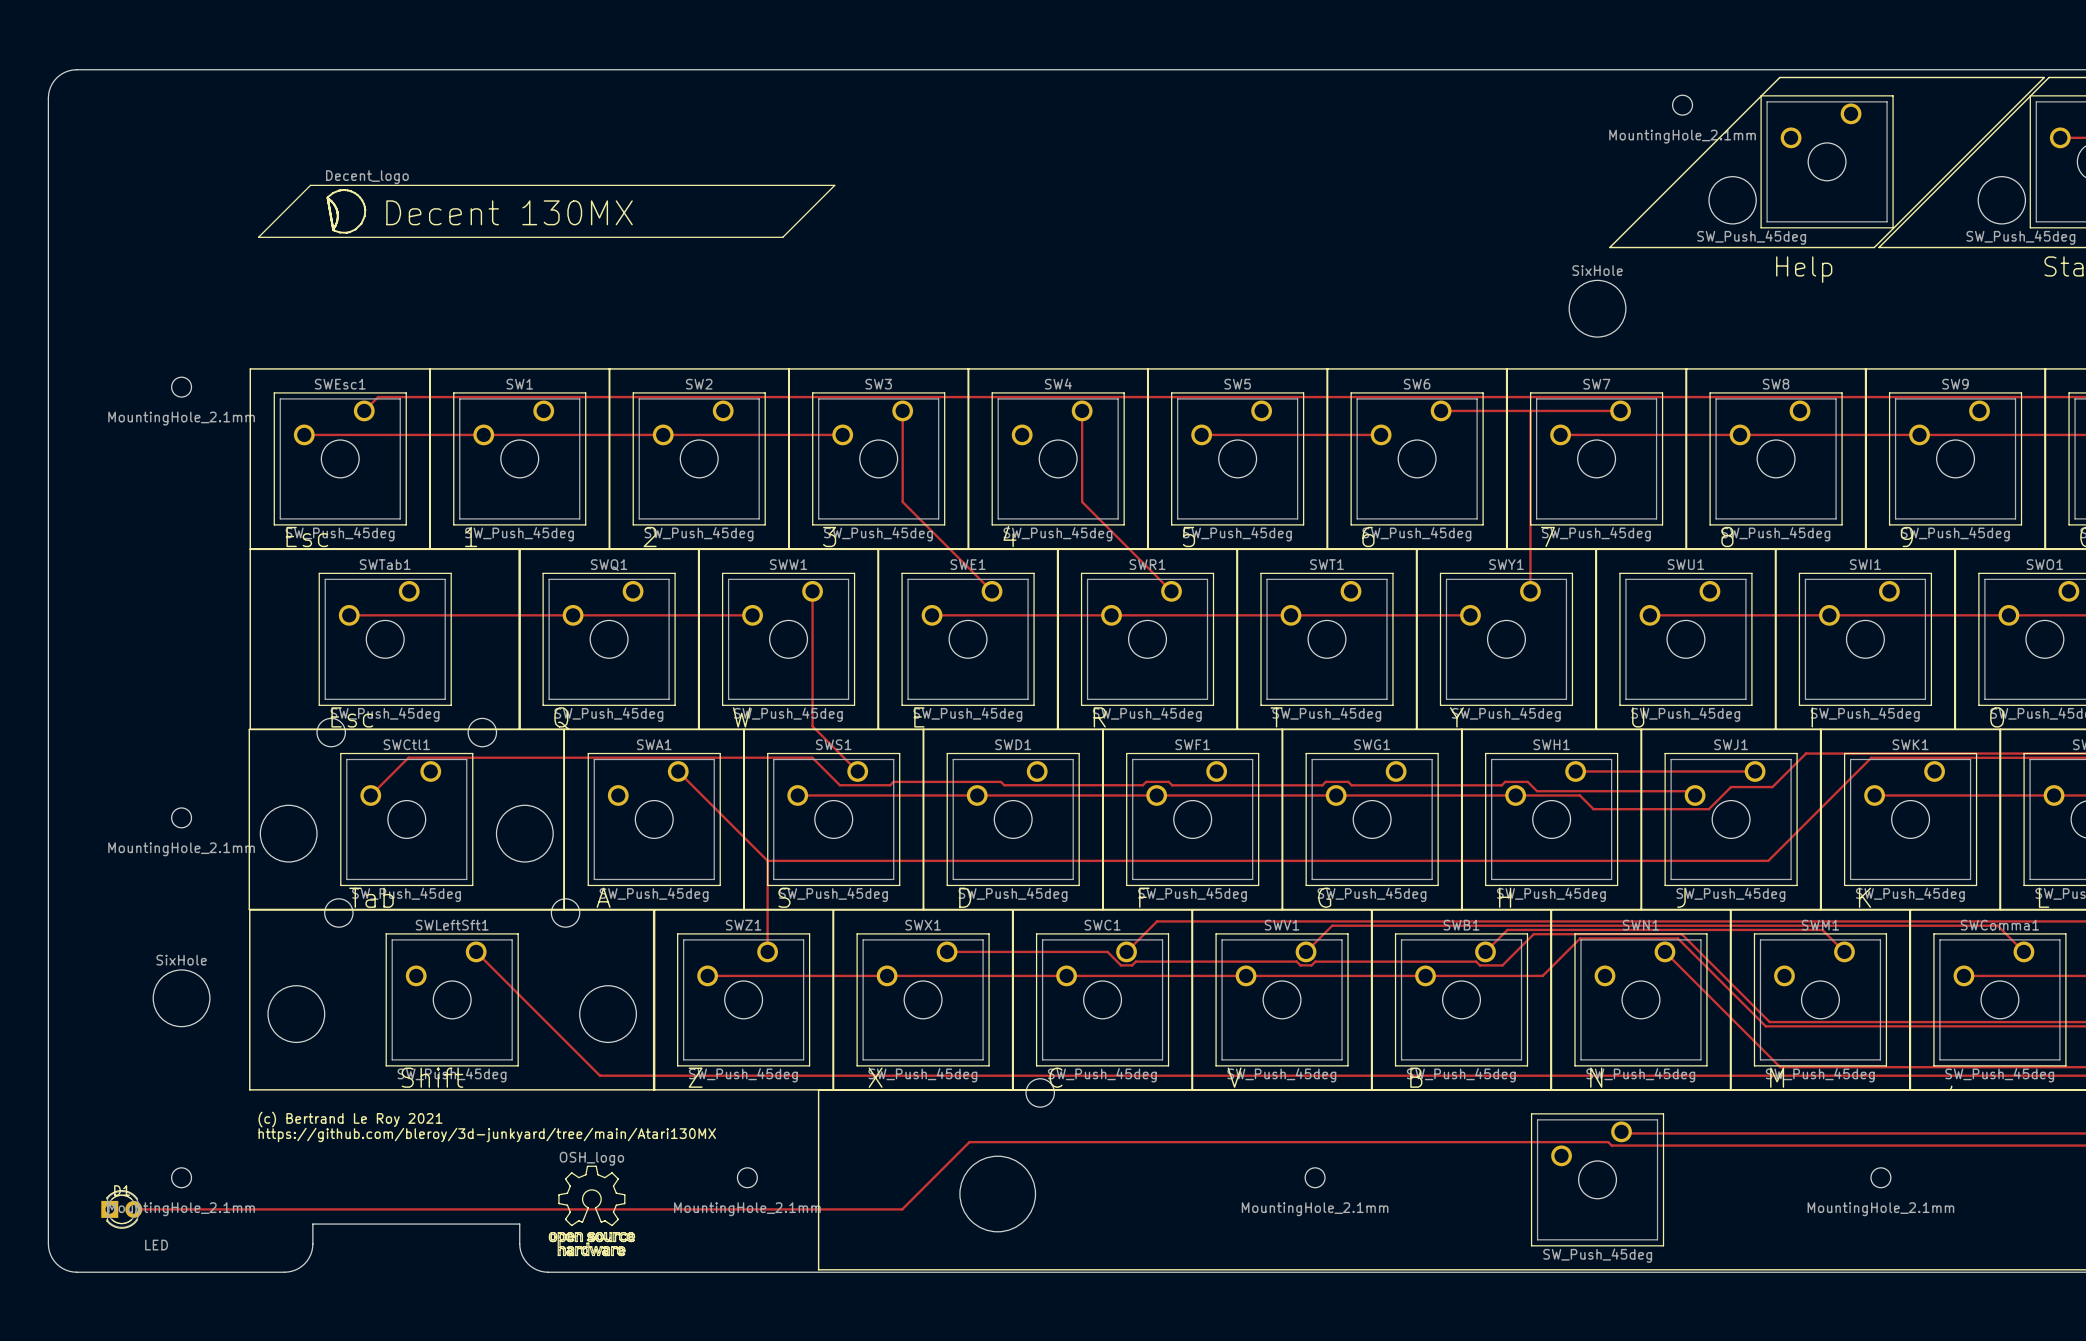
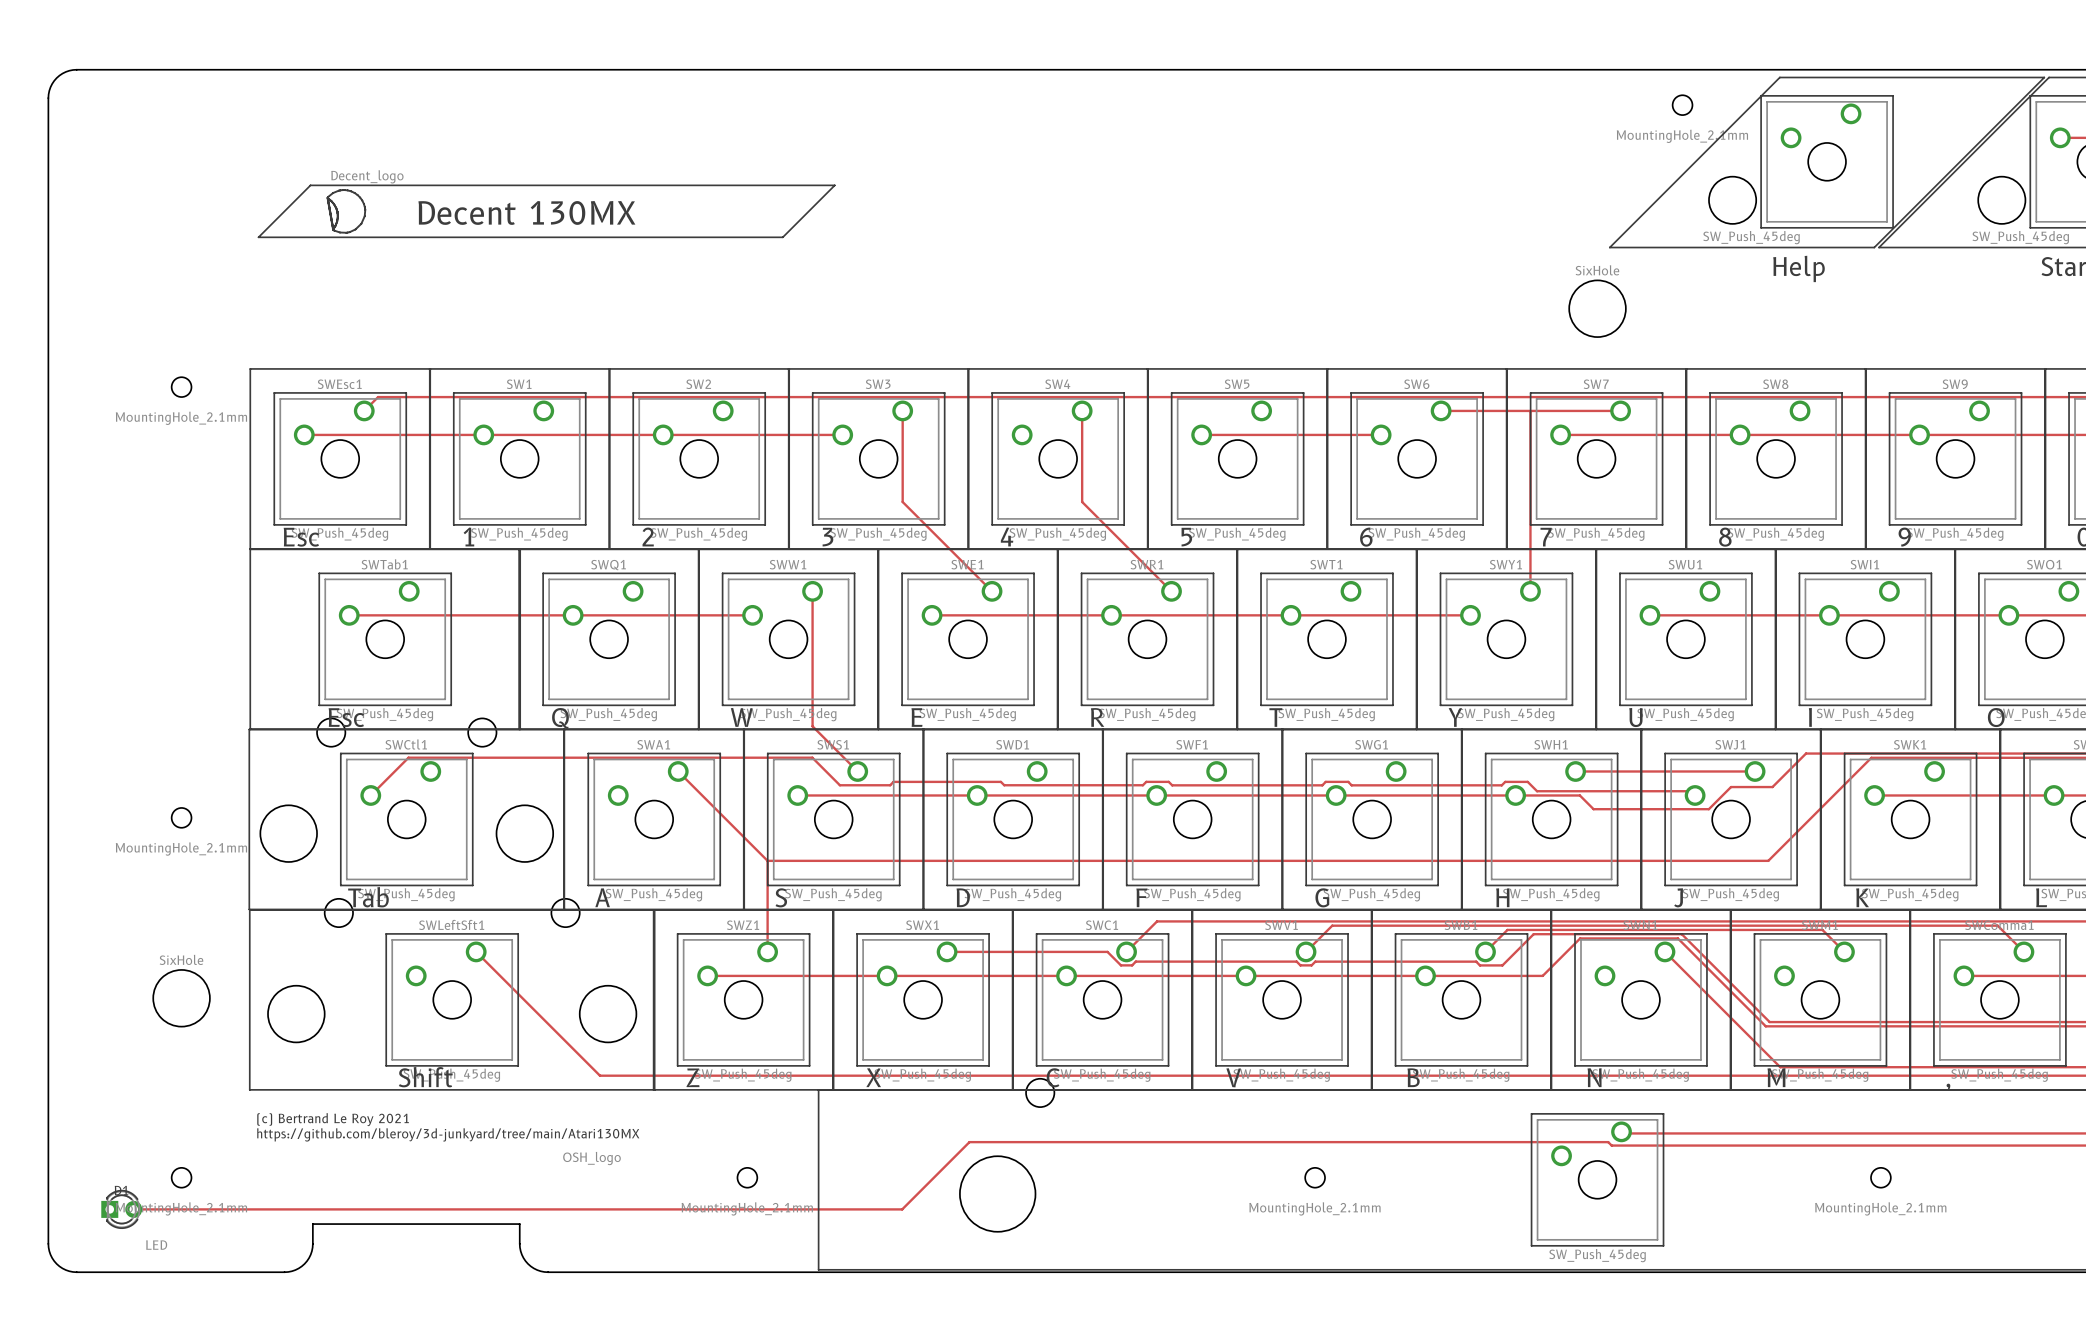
drawing: none -> [563, 1151, 621, 1166]
drawing: [548, 1165, 635, 1257] -> none

